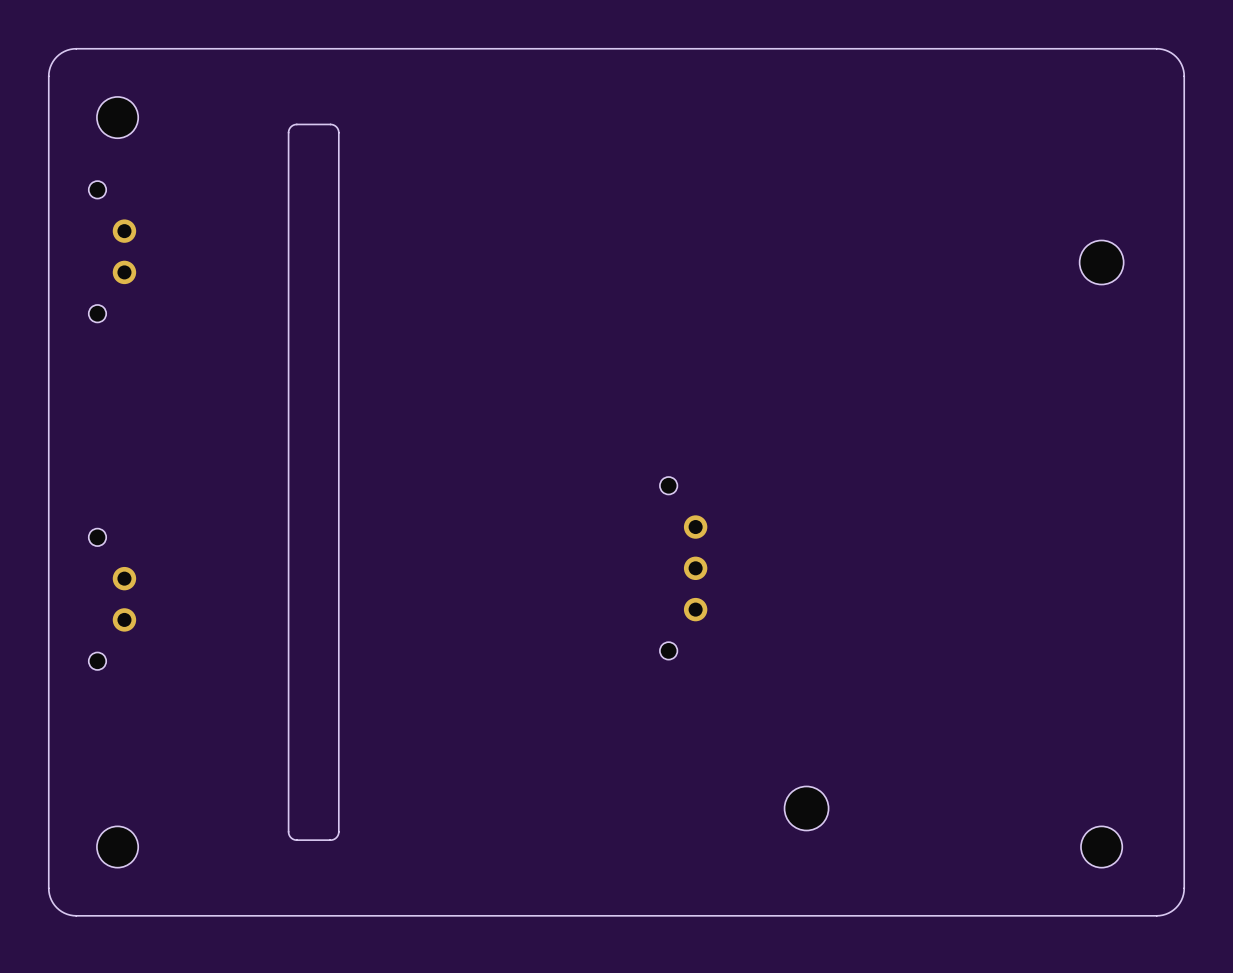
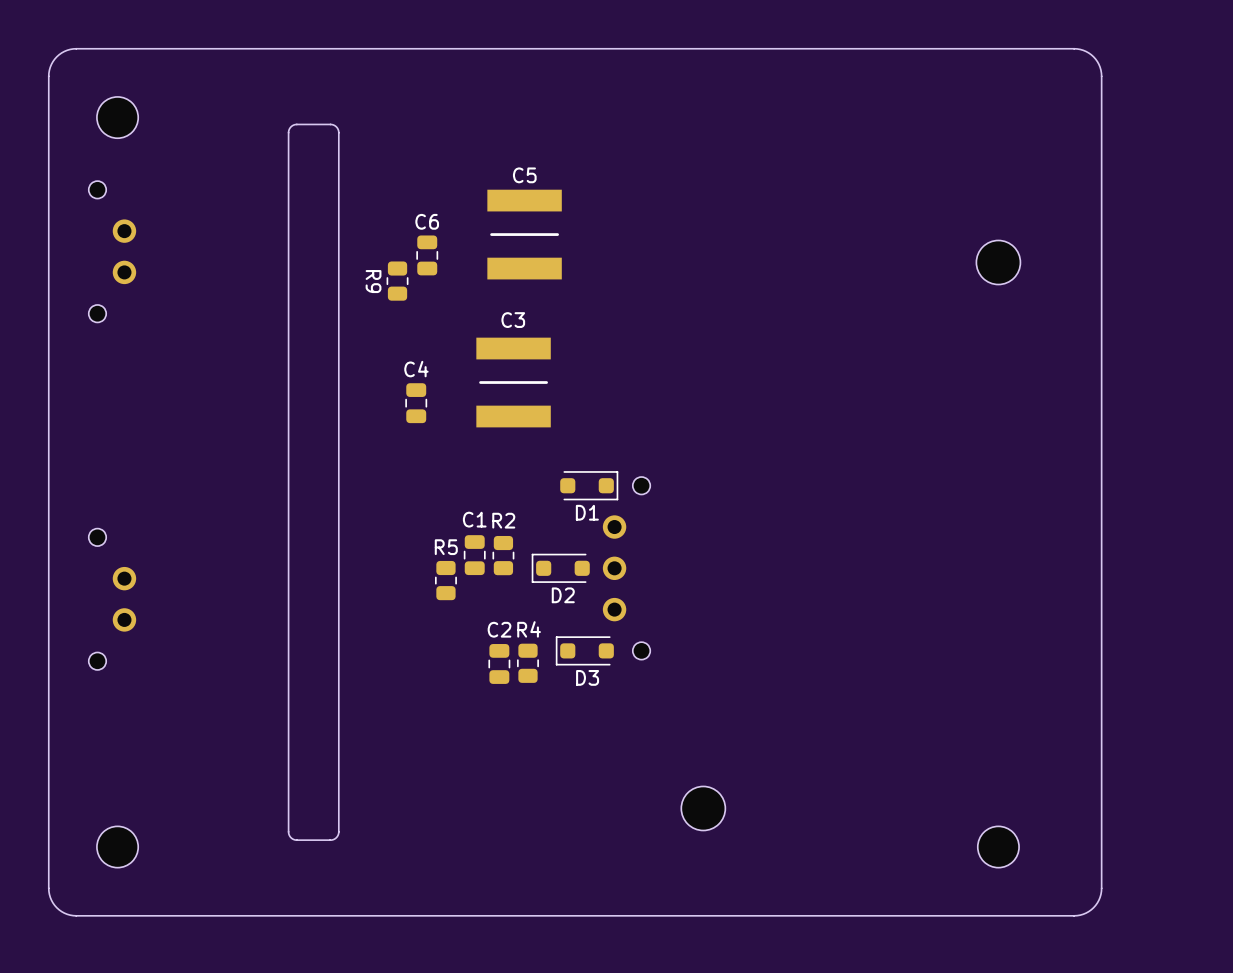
board edge: (1074, 48) (1162, 49) (1171, 52) (1178, 59) (1182, 67) (1184, 76) (1184, 891) (1181, 900) (1176, 907) (1162, 915) (1074, 915) -> (1074, 48) (1083, 50) (1093, 56) (1100, 67) (1101, 76) (1101, 888) (1098, 900) (1093, 907) (1083, 914) (1074, 915)
C5: none -> (524, 234)
C6: none -> (427, 255)
part position: (1101, 262) -> (998, 262)
R9: none -> (397, 281)
C3: none -> (513, 382)
C4: none -> (416, 403)
D1: none -> (589, 485)
C1: none -> (474, 555)
R2: none -> (503, 555)
D2: none -> (560, 568)
part rotation: 0° (683, 568) -> 180° (626, 568)
R5: none -> (445, 580)
D3: none -> (584, 650)
C2: none -> (499, 663)
R4: none -> (527, 663)
part position: (806, 808) -> (703, 808)
part position: (1101, 847) -> (998, 847)

